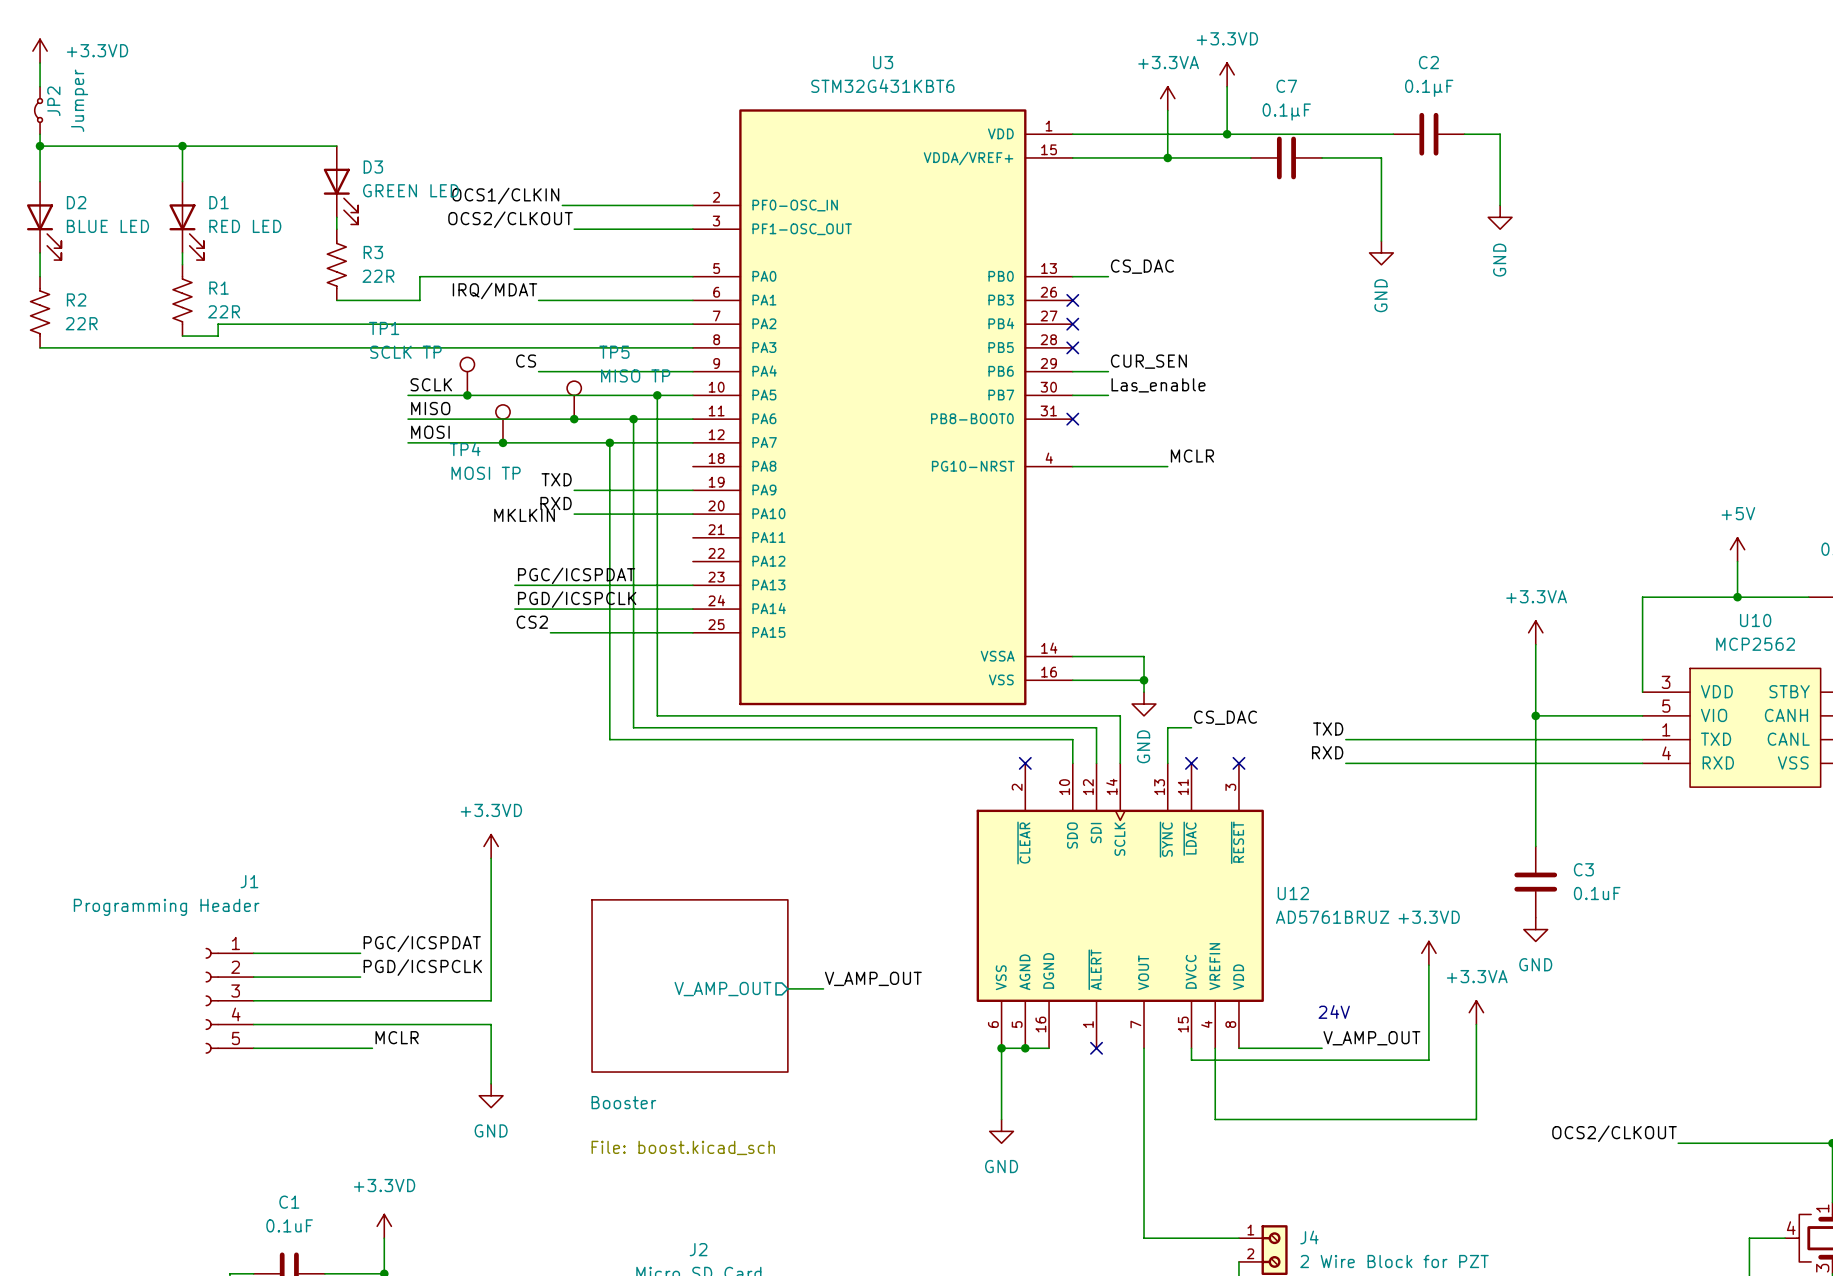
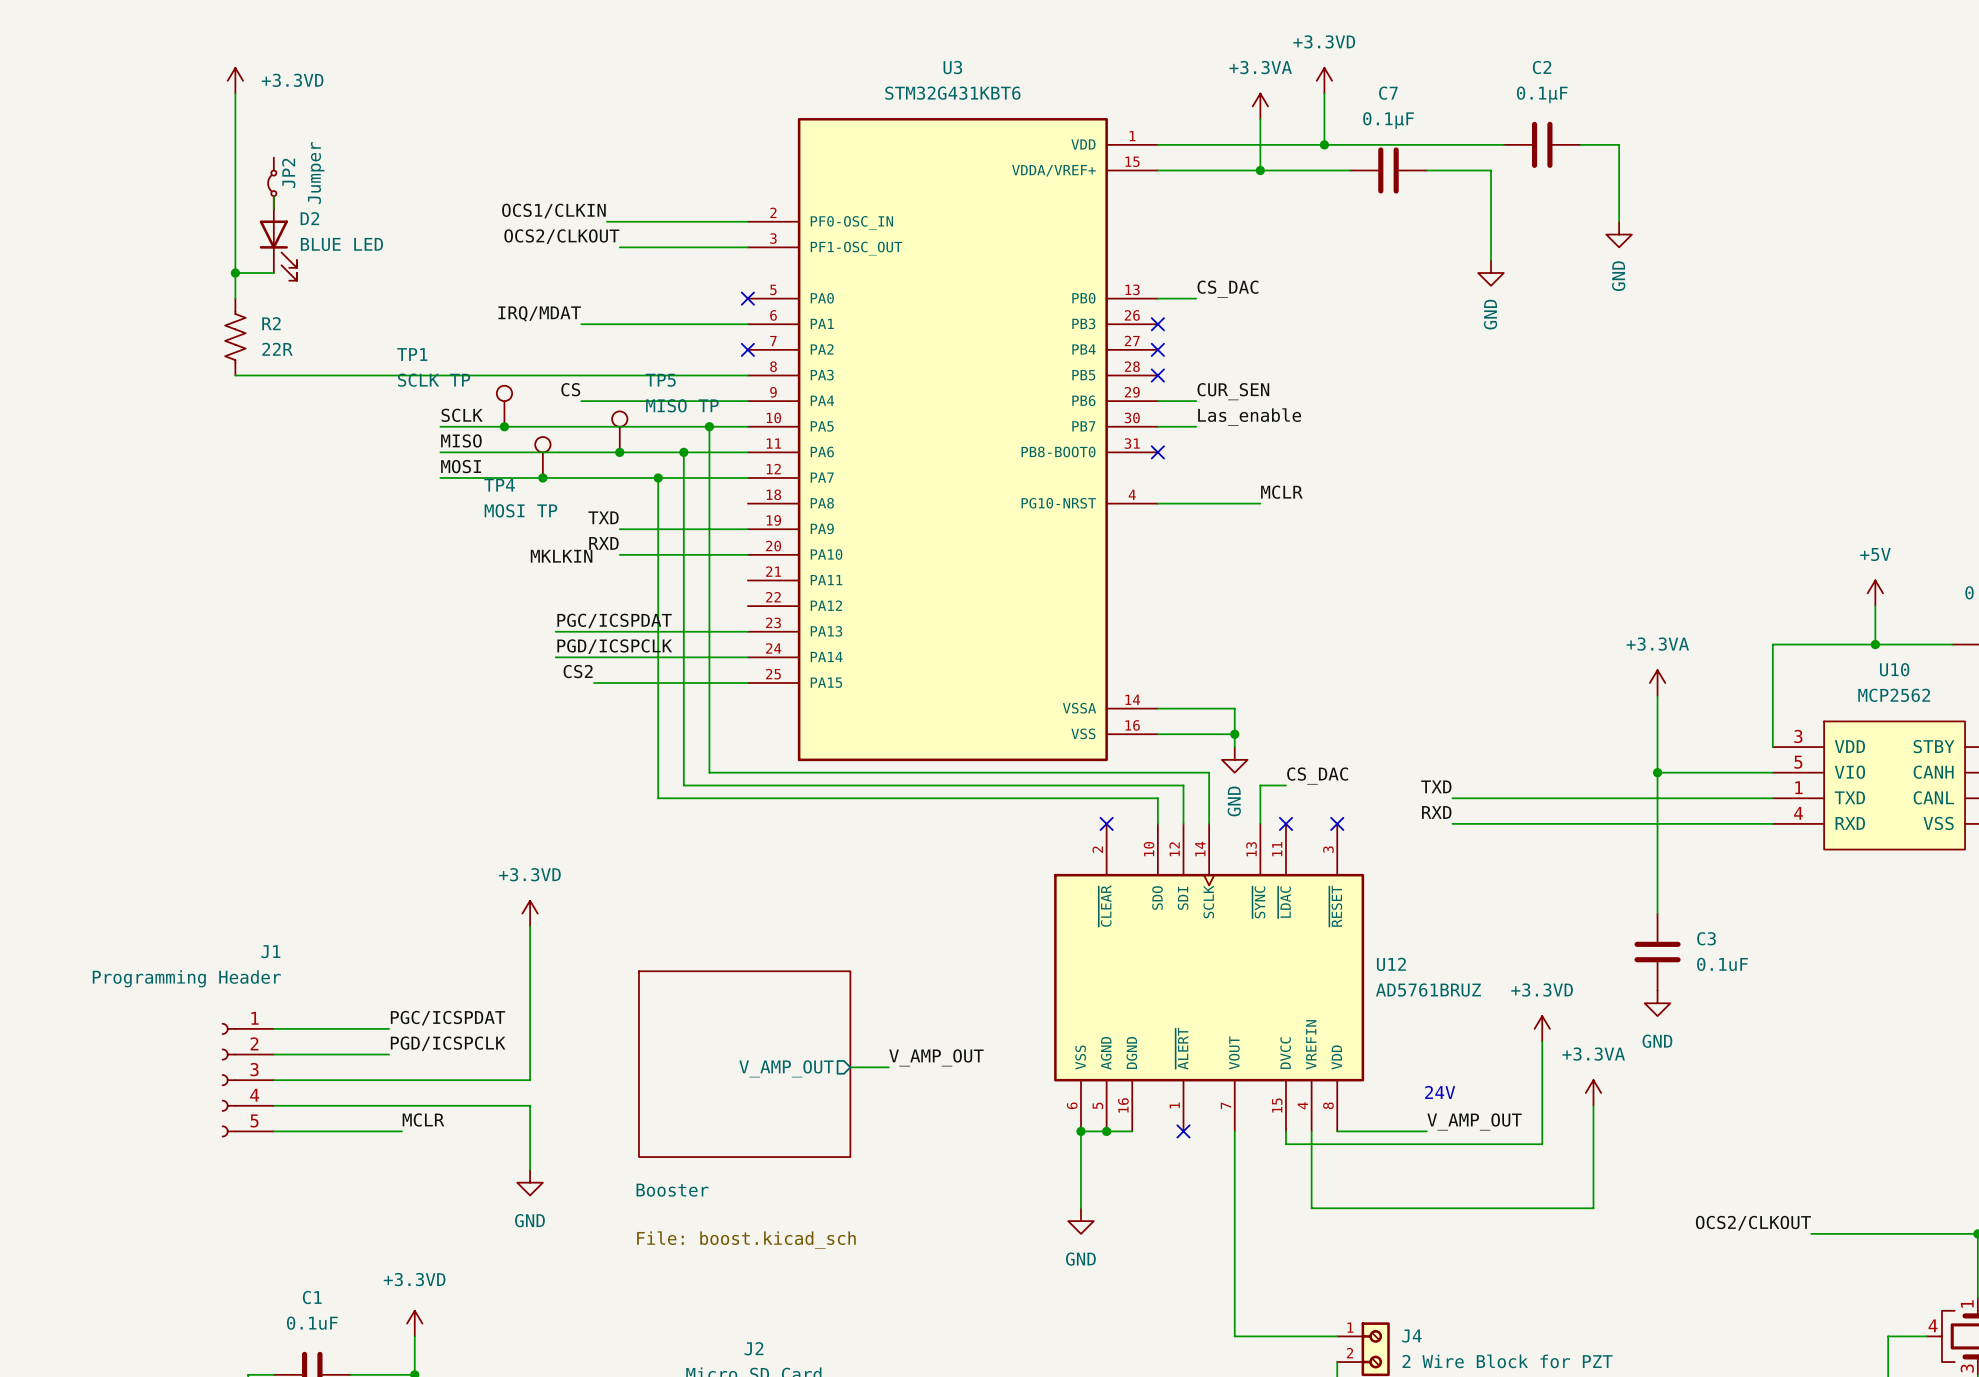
power symbol position: +3.3VD (40, 51) -> +3.3VD (235, 80)
wire: (40, 63) (40, 86) -> none
wire: none -> (235, 93) (235, 298)
JP2 position: (38, 110) -> (272, 183)
wire: (40, 134) (40, 181) -> none
wire: (40, 146) (336, 146) -> none
junction: (40, 146) -> none
wire: (182, 146) (182, 181) -> none
junction: (182, 146) -> none
D3: GREEN LED (340, 185) -> none
wire: (336, 217) (336, 229) -> (273, 196) (273, 208)
D2 position: (44, 220) -> (278, 238)
D1: RED LED (186, 220) -> none
wire: (40, 252) (40, 276) -> none
wire: (182, 252) (182, 264) -> none
wire: none -> (235, 273) (273, 273)
junction: none -> (235, 273)
R3: 22R (336, 264) -> none
wire: (692, 276) (419, 276) (419, 300) (336, 300) -> none
no-connect mark: none -> (747, 298)
R1: 22R (182, 300) -> none
R2 position: (40, 312) -> (235, 337)
wire: (692, 324) (218, 324) (218, 336) (182, 336) -> none
no-connect mark: none -> (747, 349)
wire: (40, 347) (218, 347) -> none

